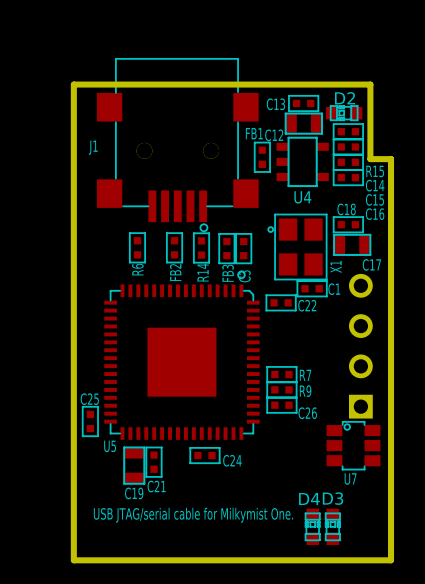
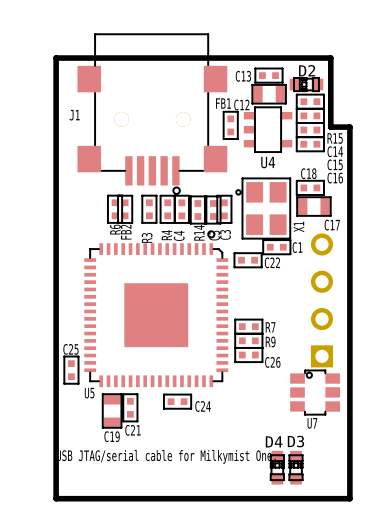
FB2: none -> (125, 209)
R4: none -> (167, 209)
R14: (201, 247) -> none
C4: none -> (181, 209)
C3: none -> (224, 209)
FB2 name: FB2 (175, 272) -> R3 (147, 237)
FB3 name: FB3 (228, 273) -> R14 (199, 232)

